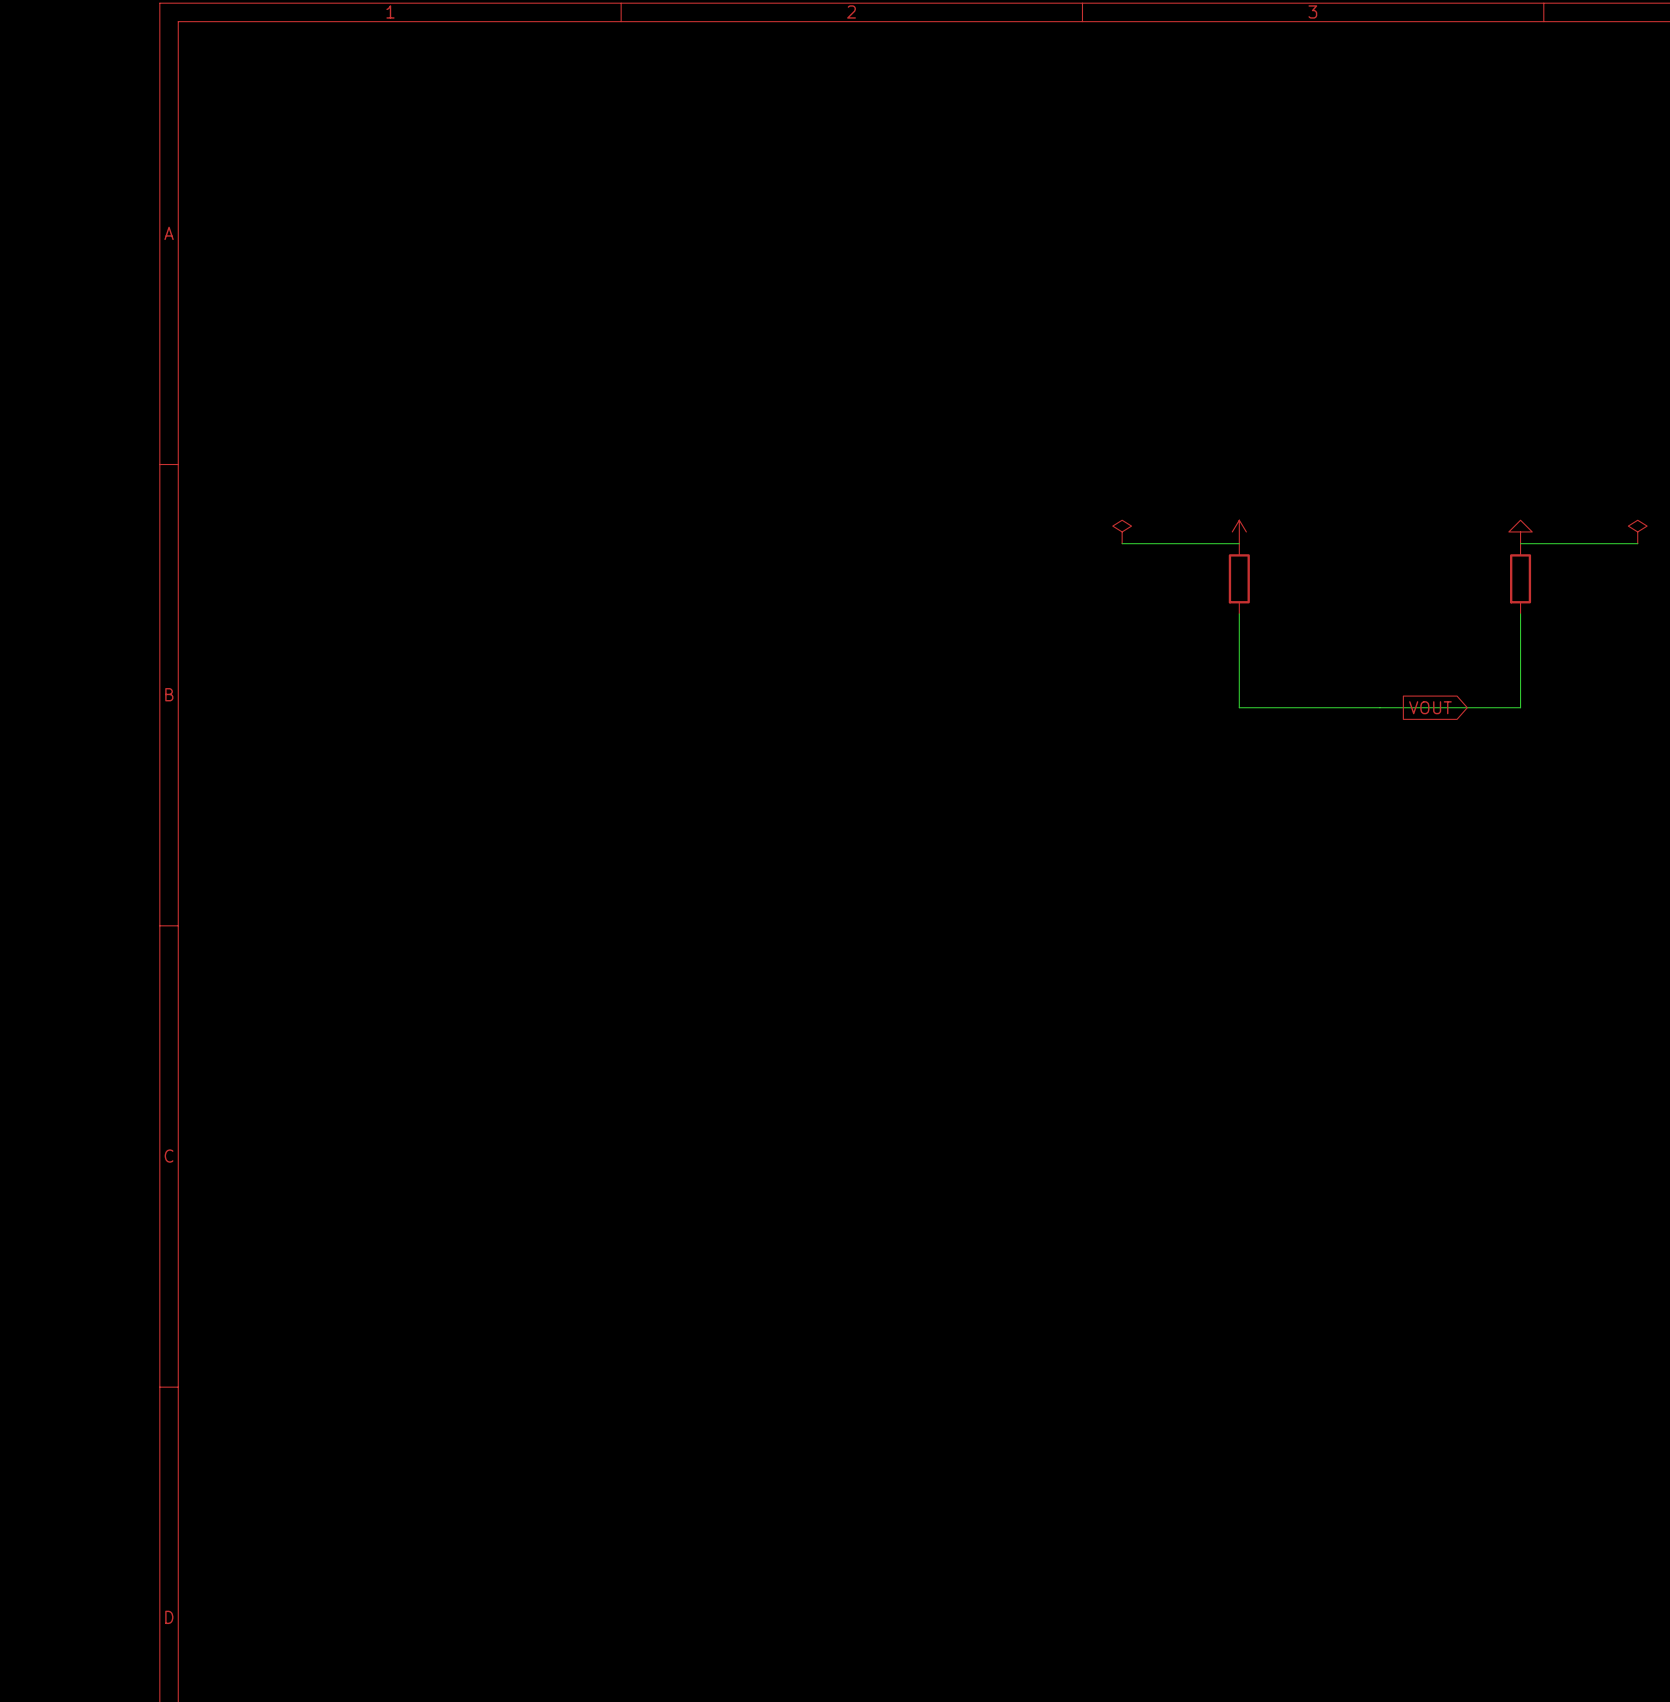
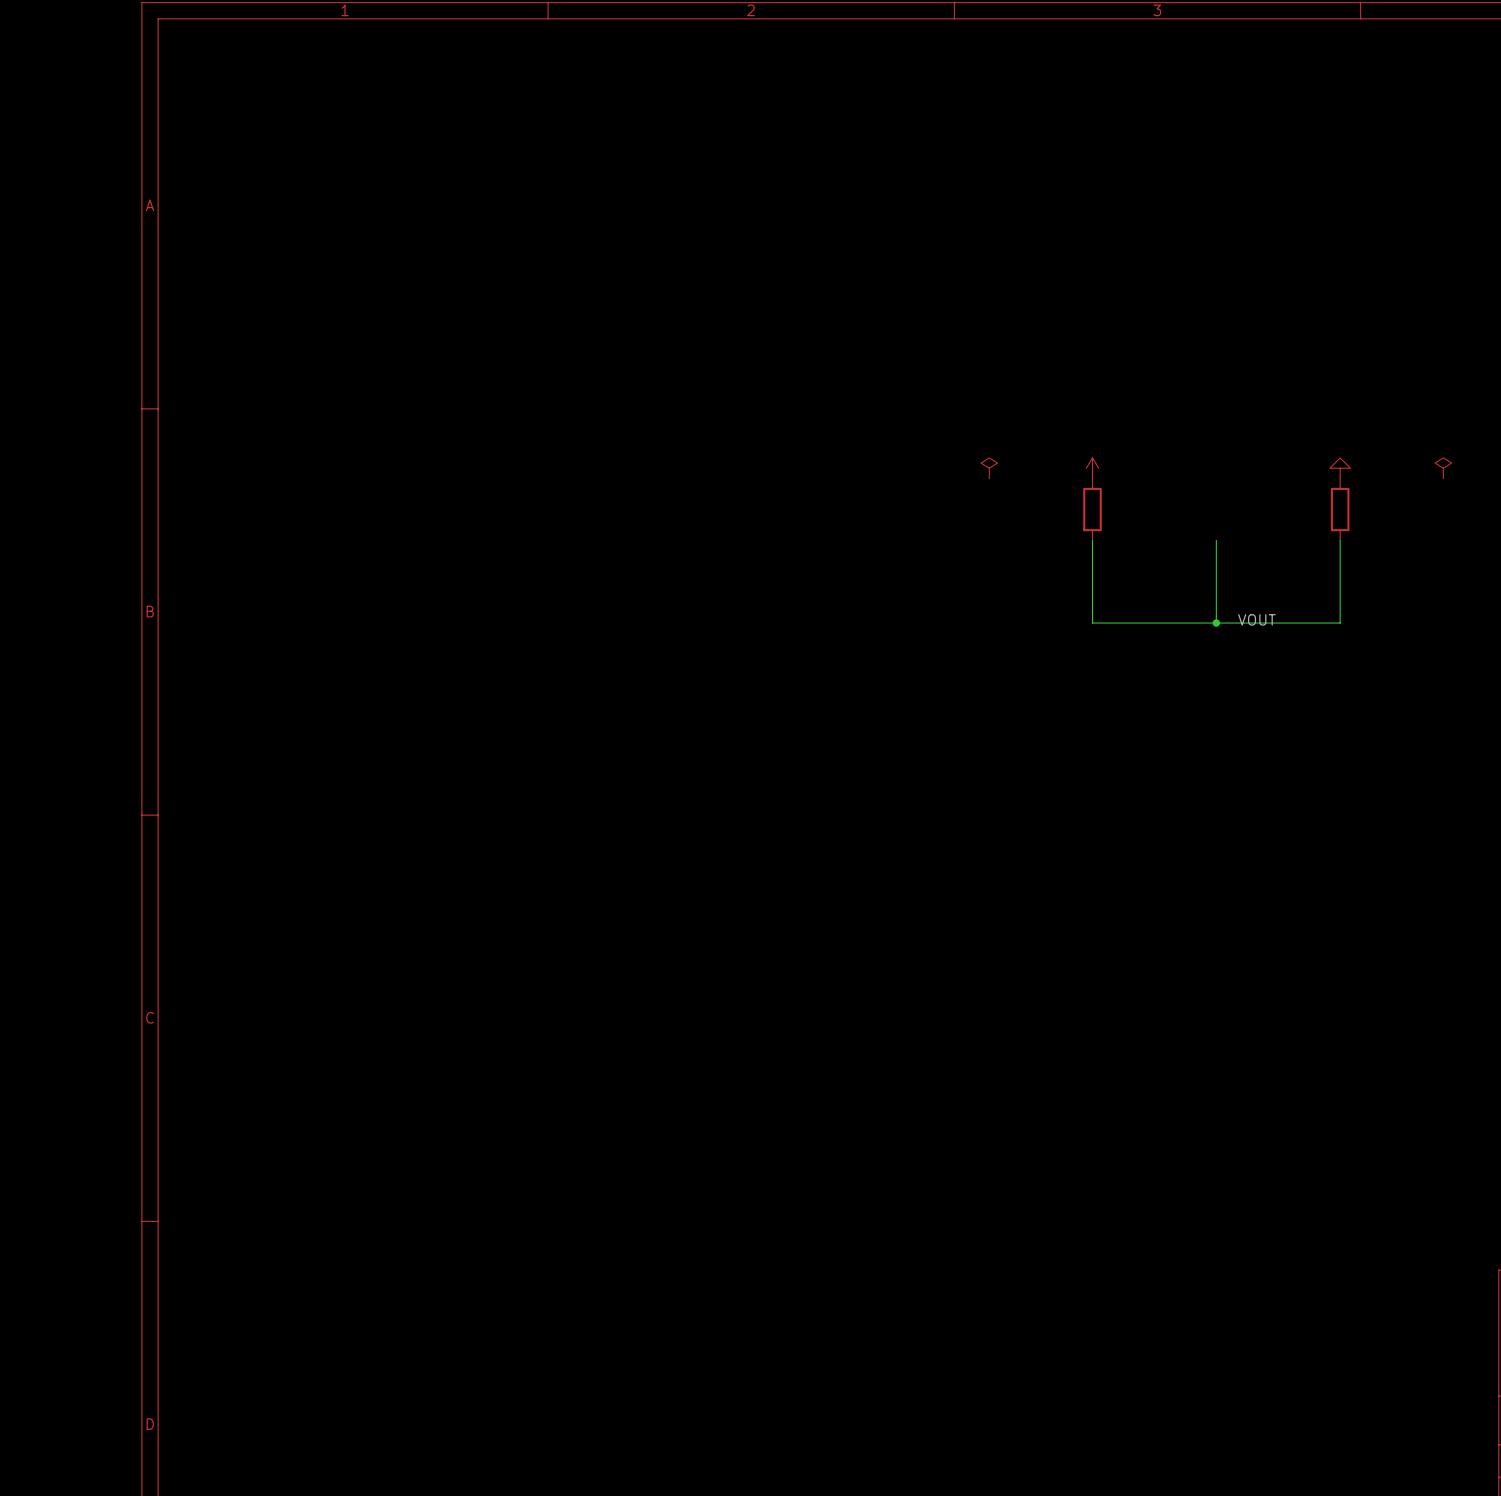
wire: (1122, 543) (1239, 543) -> none
wire: (1520, 543) (1637, 543) -> none
wire: none -> (1216, 540) (1216, 623)
label: none -> VOUT (1256, 619)
junction: none -> (1216, 623)
global label: VOUT (1430, 707) -> none

